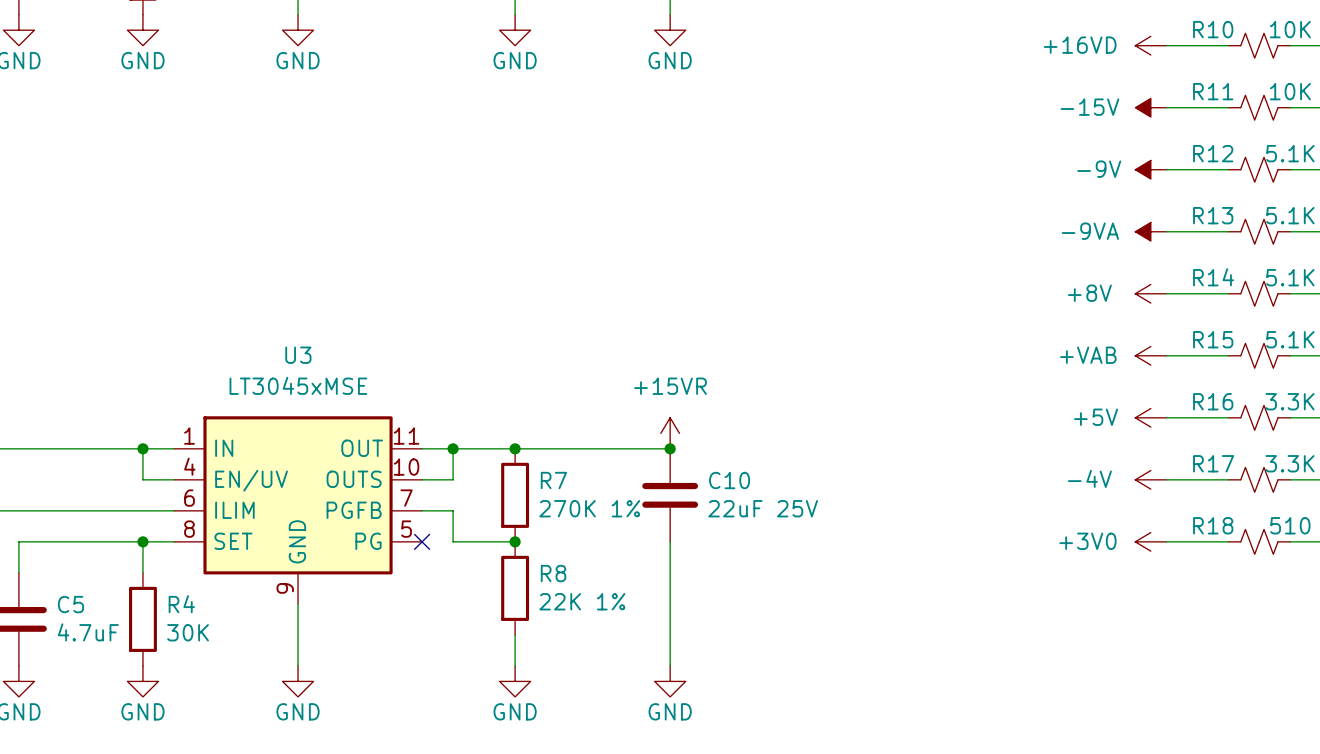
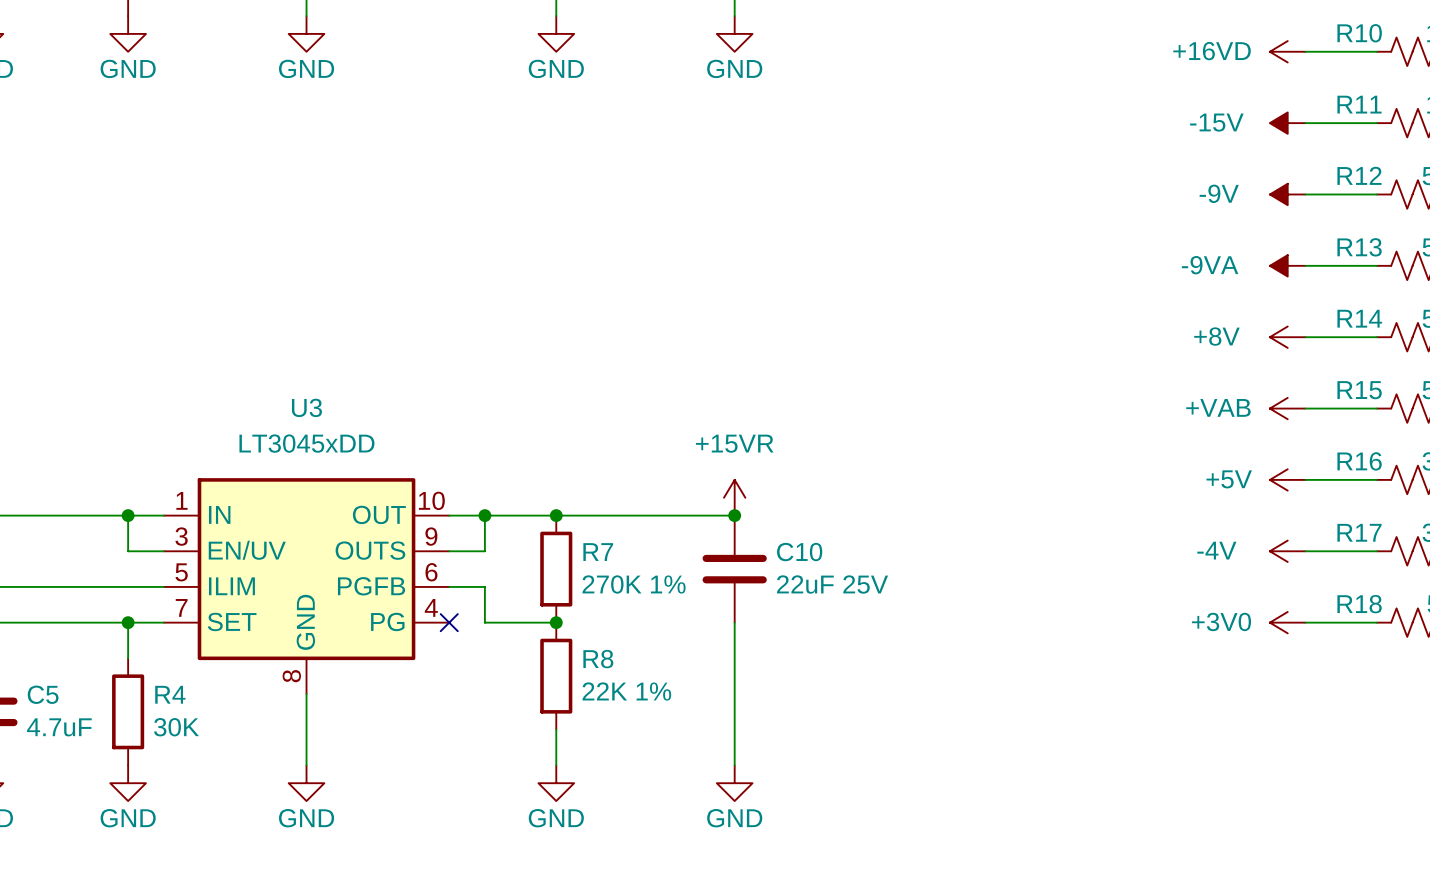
U3 value: LT3045xMSE (298, 385) -> LT3045xDD (306, 443)
U3 pin number: 11 (406, 436) -> 10 (431, 500)
U3 pin number: 4 (189, 466) -> 3 (181, 536)
U3 pin number: 10 (406, 467) -> 9 (431, 536)
U3 pin number: 6 (189, 498) -> 5 (181, 572)
U3 pin number: 7 (406, 498) -> 6 (431, 572)
U3 pin number: 8 (189, 529) -> 7 (181, 607)
U3 pin number: 5 (406, 529) -> 4 (431, 607)
U3 pin number: 9 (285, 588) -> 8 (291, 676)

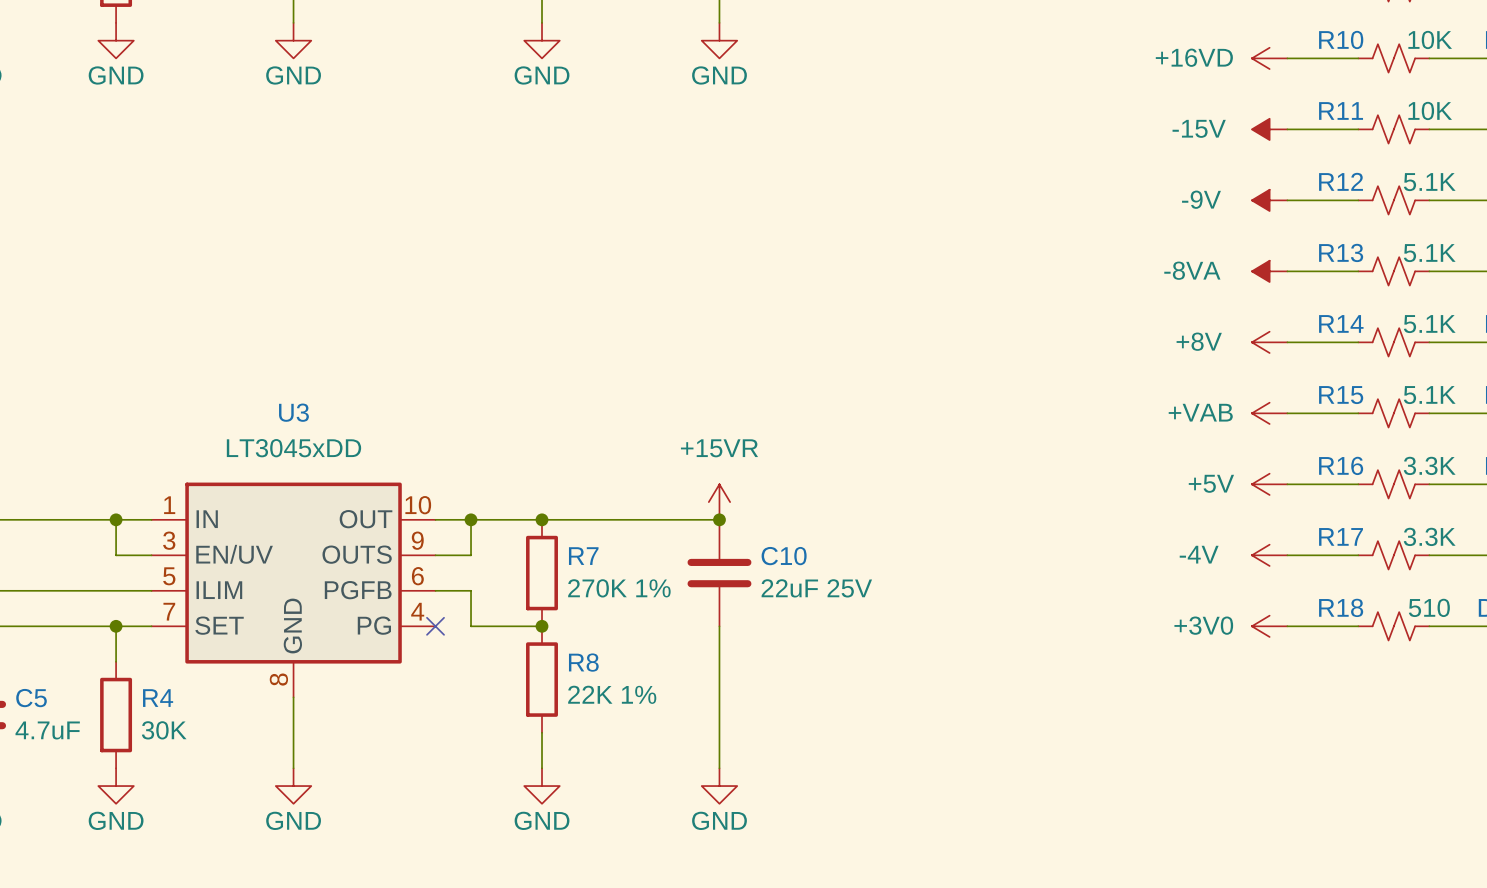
power symbol: -9VA (1287, 265) -> -8VA (1269, 271)

